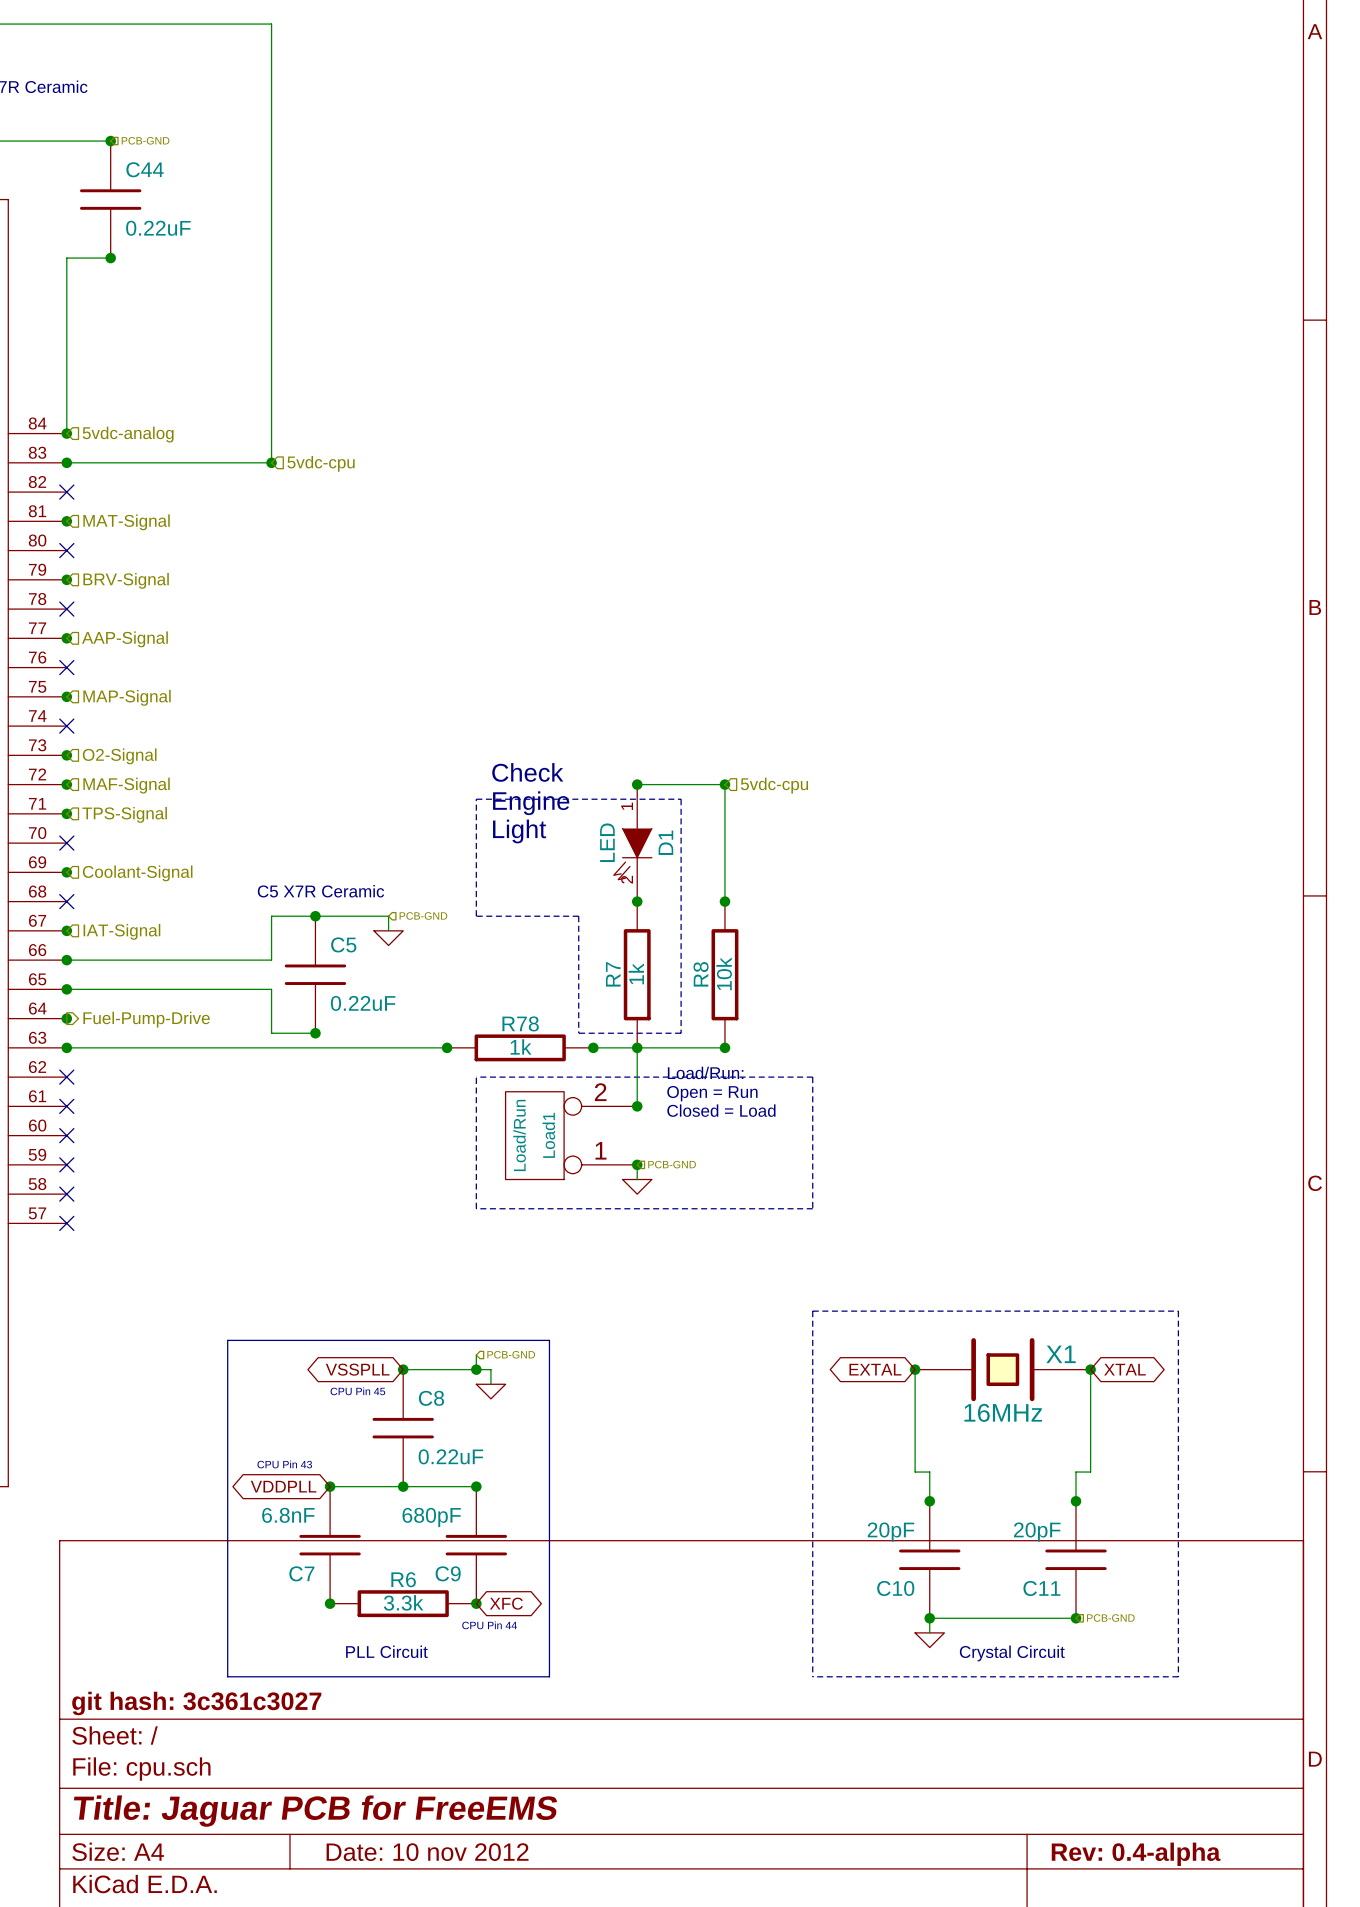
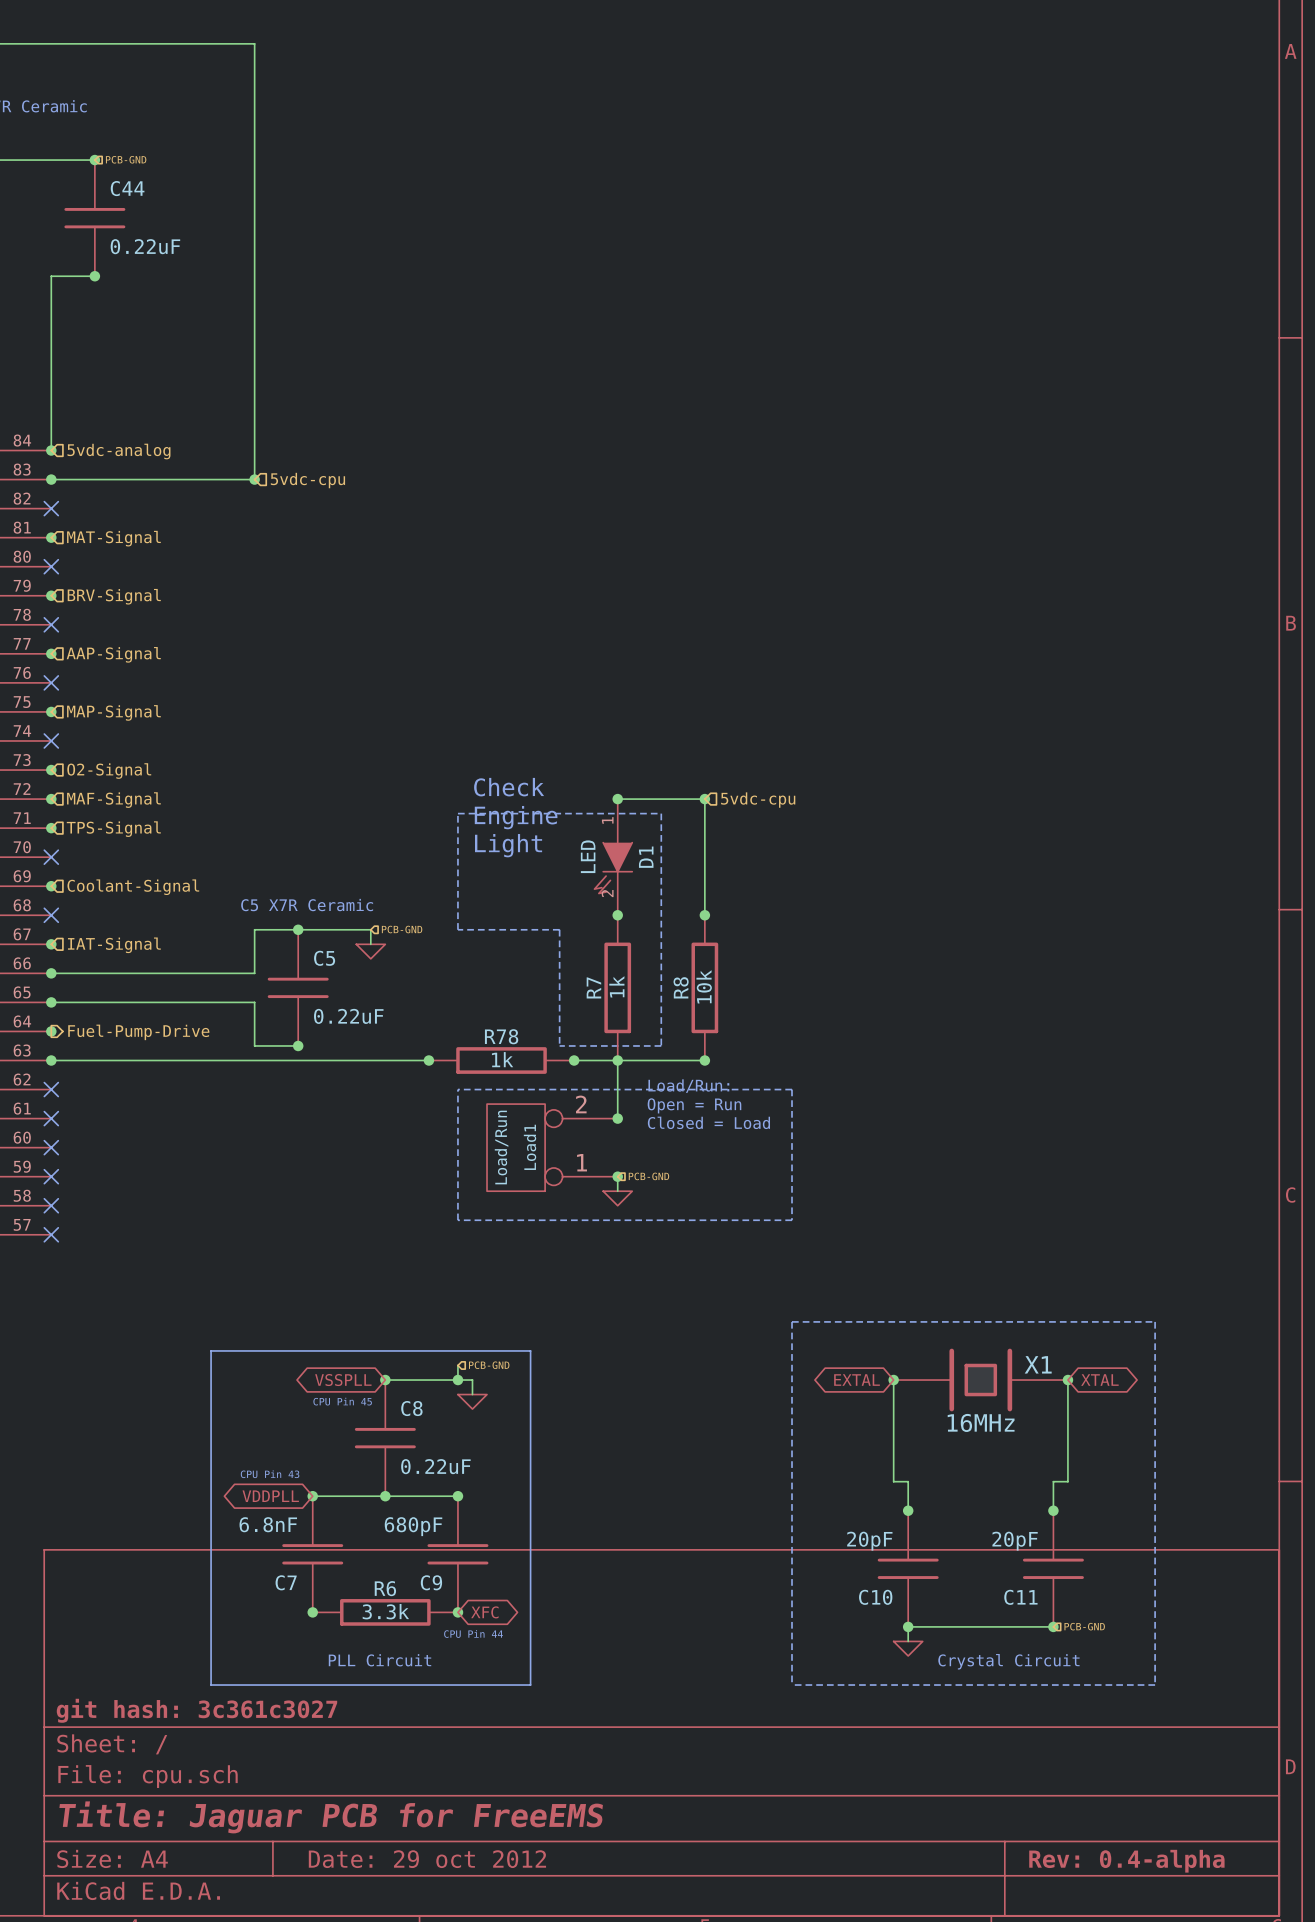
title block: Date: 10 nov 2012 (427, 1852) -> Date: 29 oct 2012 (427, 1859)

